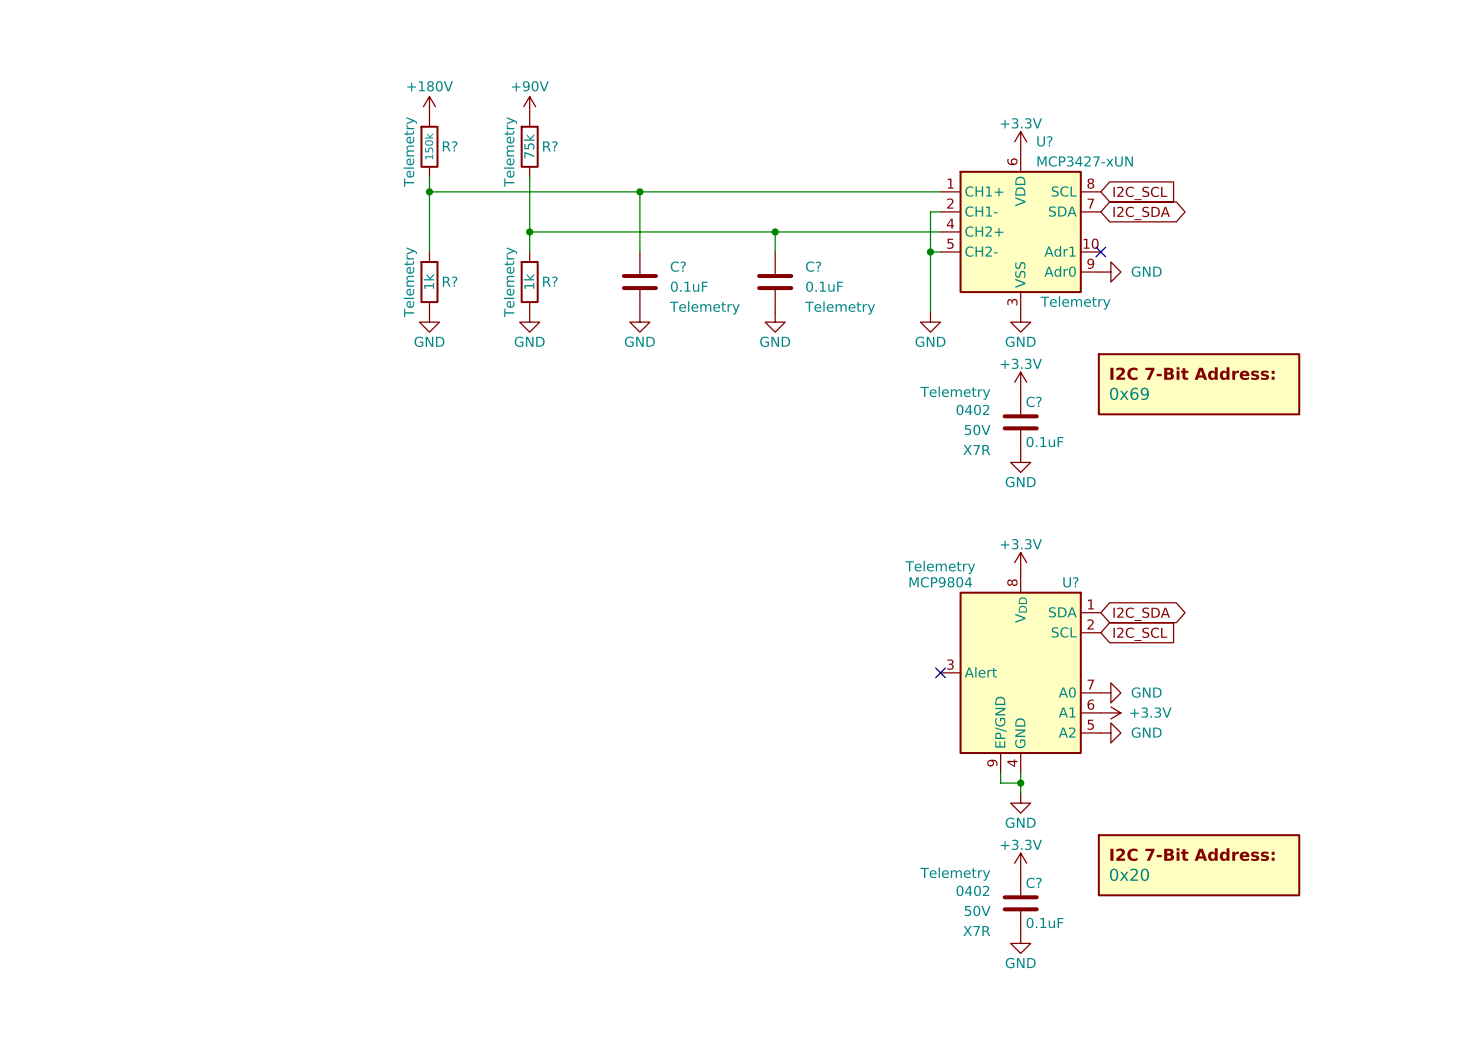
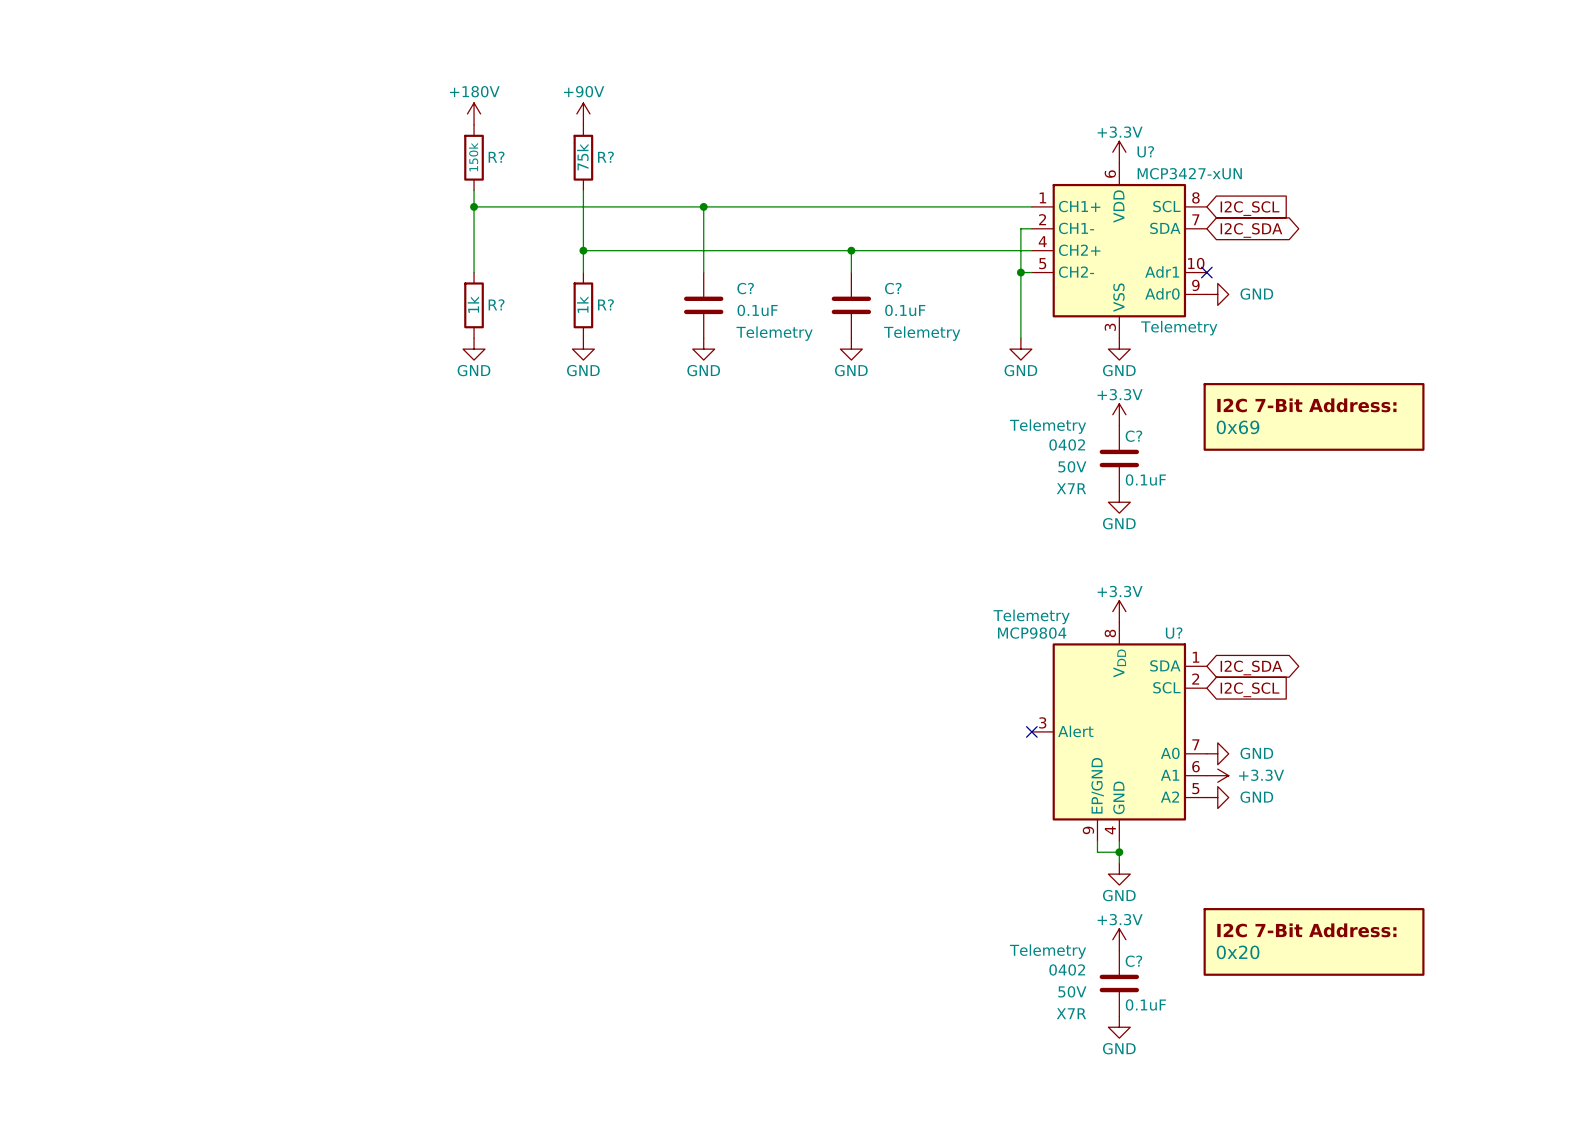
R? text: Telemetry (410, 152) -> none
R? text: Telemetry (510, 152) -> none
R? text: Telemetry (410, 282) -> none
R? text: Telemetry (510, 282) -> none

